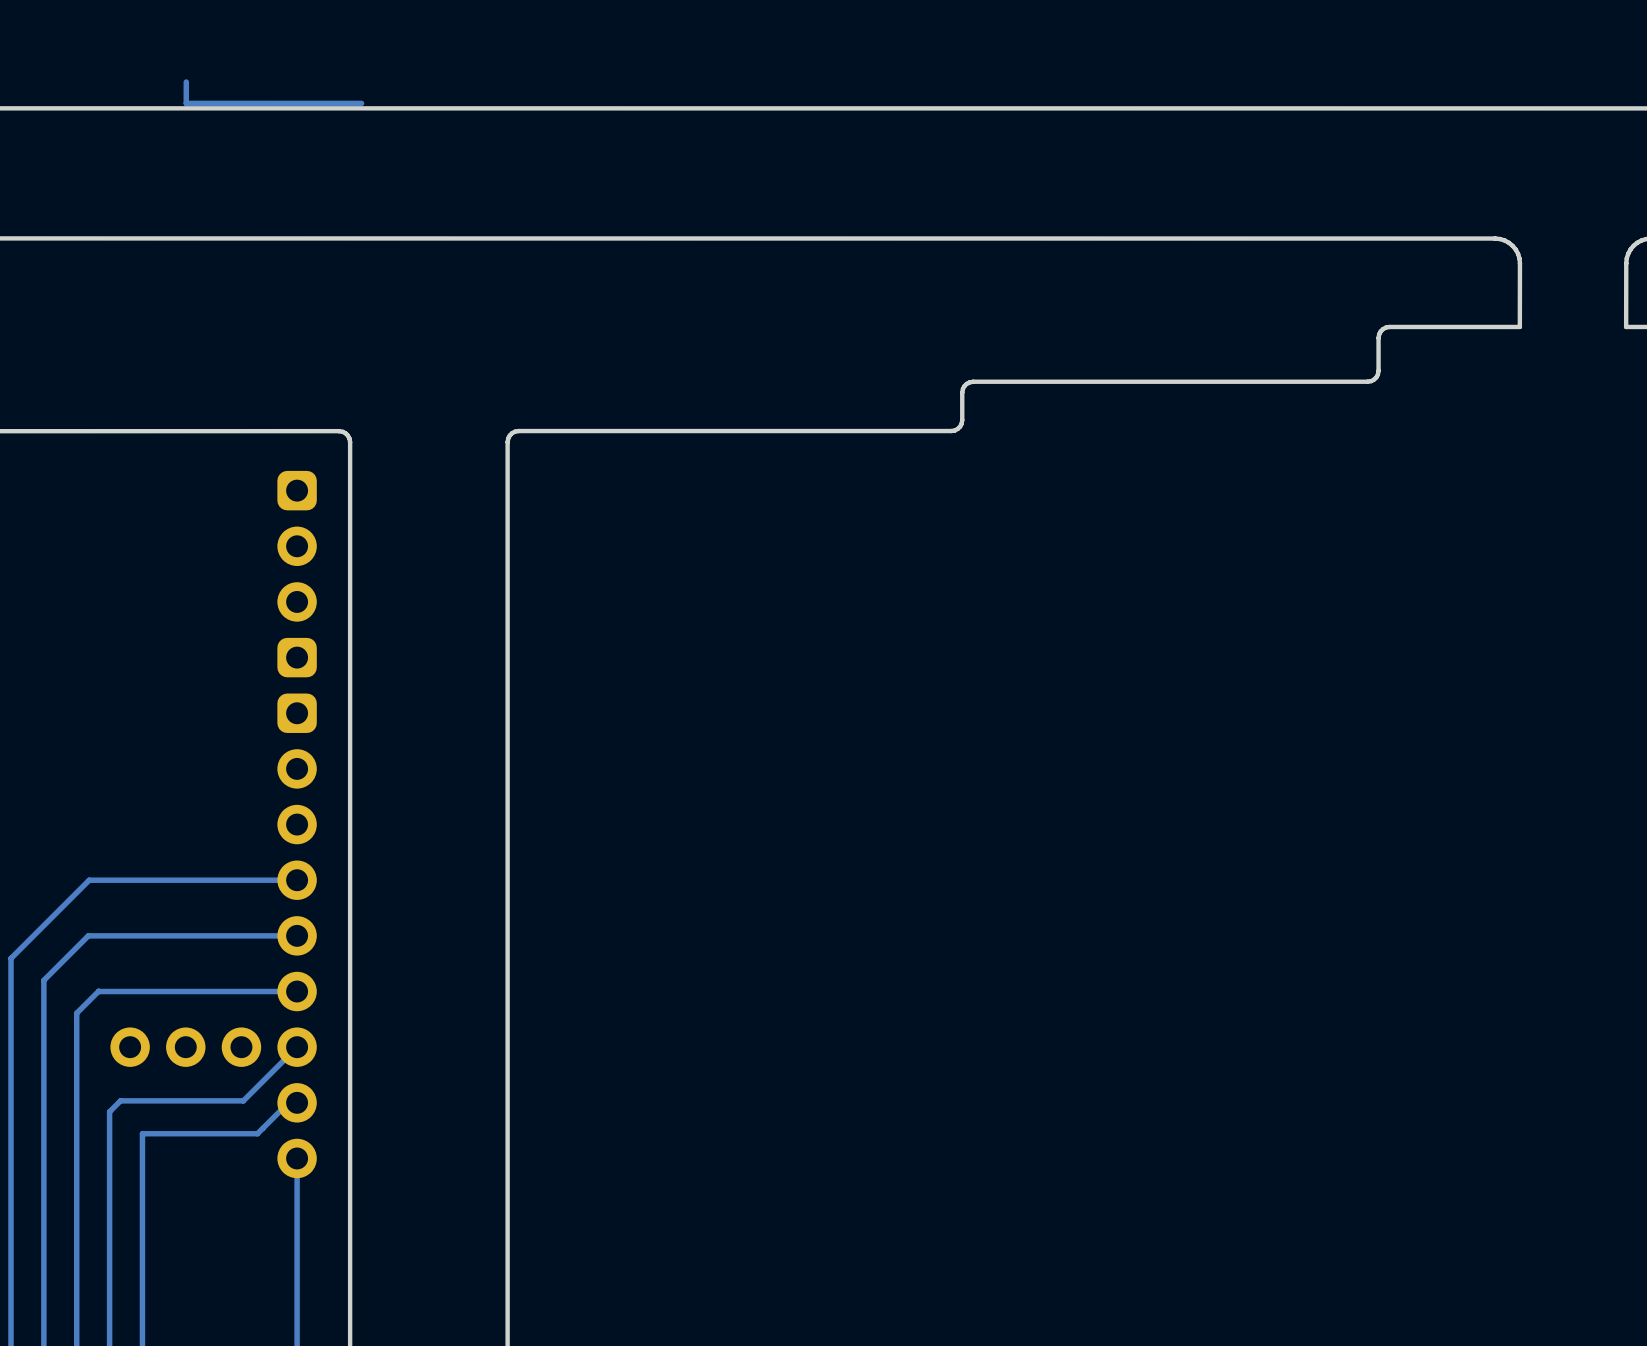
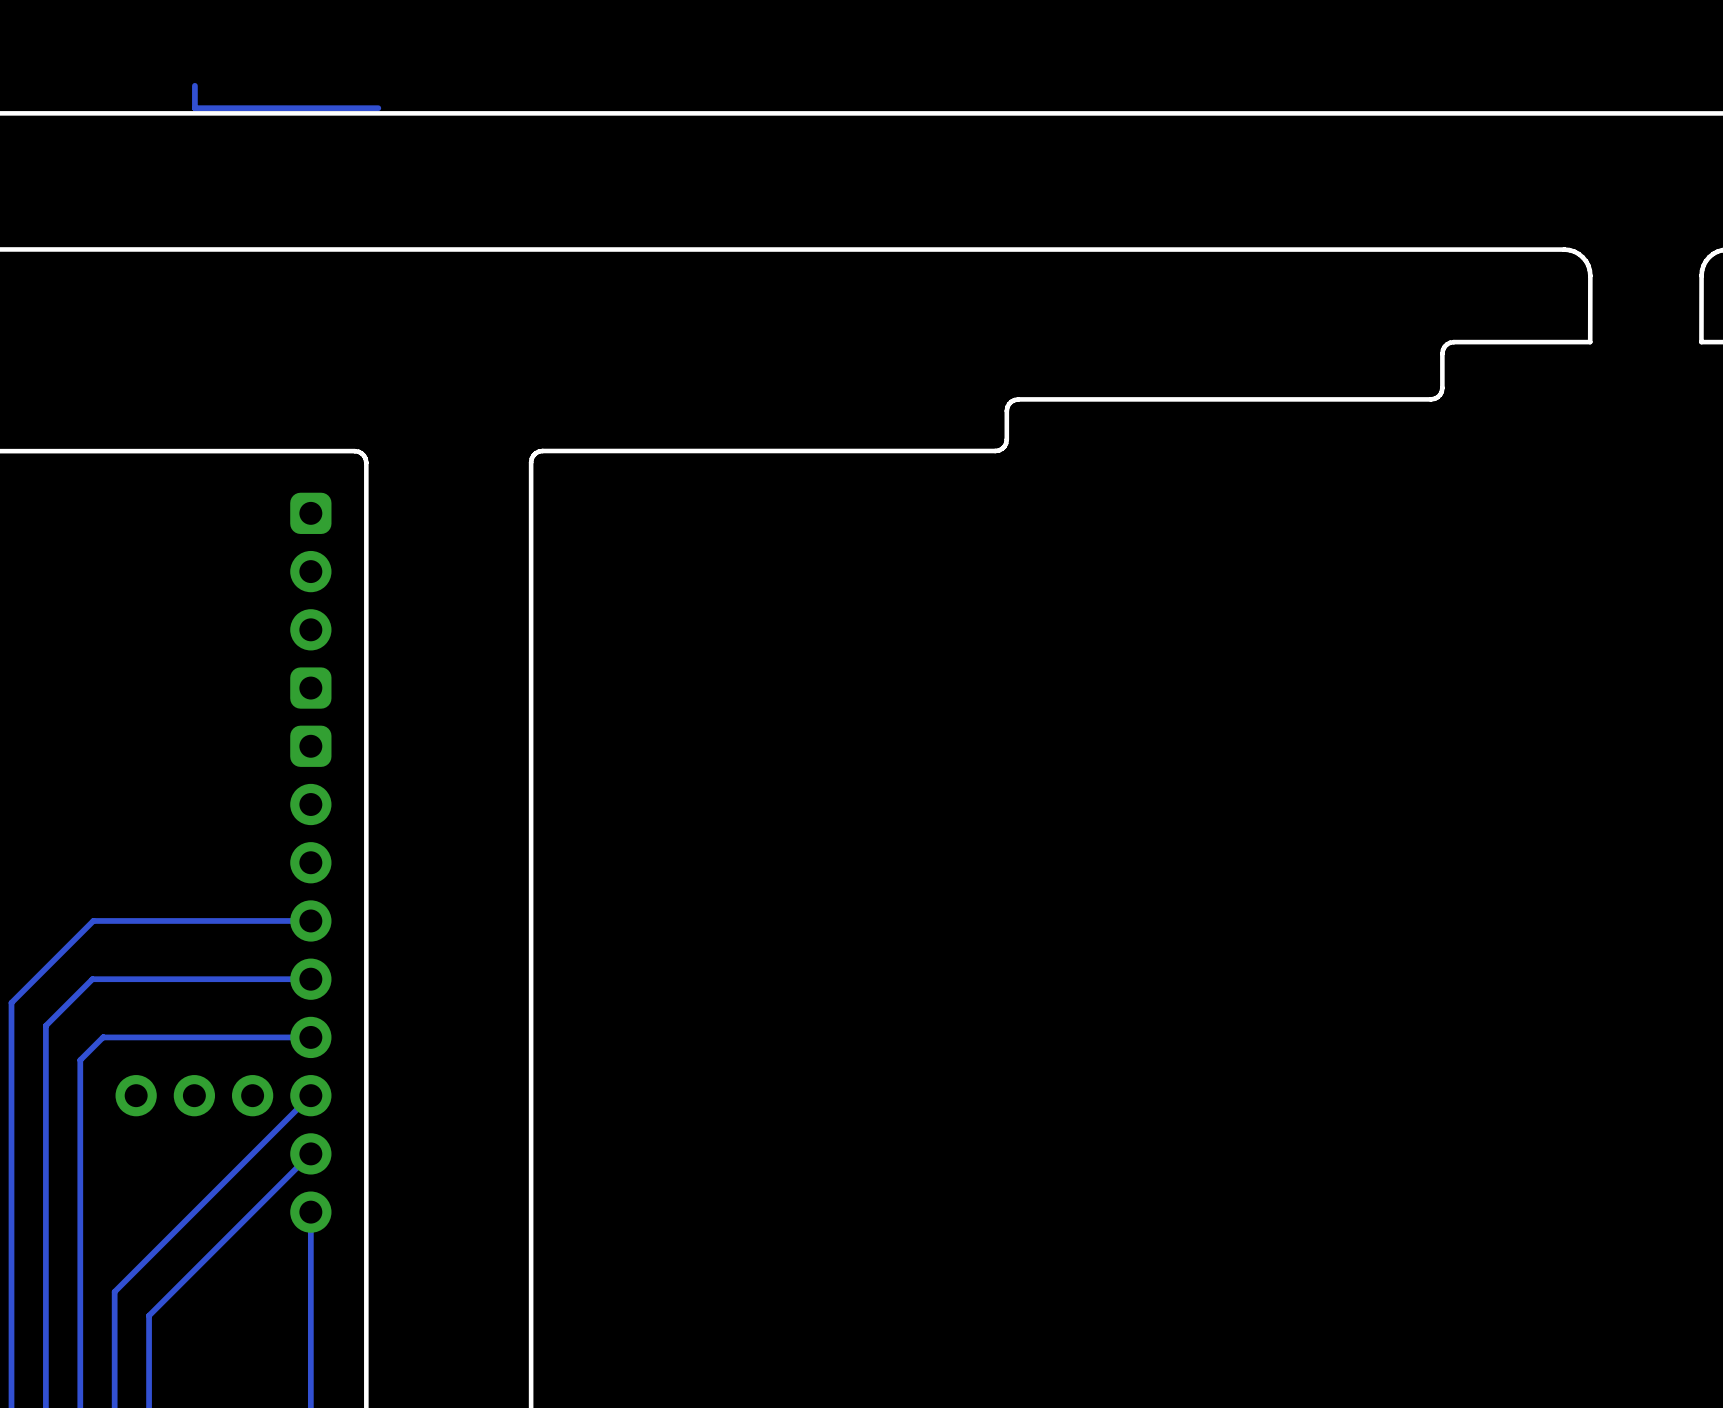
track: (243, 1100) (120, 1100) (109, 1111) (109, 1234) -> (254, 1151) (114, 1291)
track: (297, 1102) (288, 1102) (257, 1133) (142, 1133) (142, 1257) -> (310, 1153) (149, 1315)

